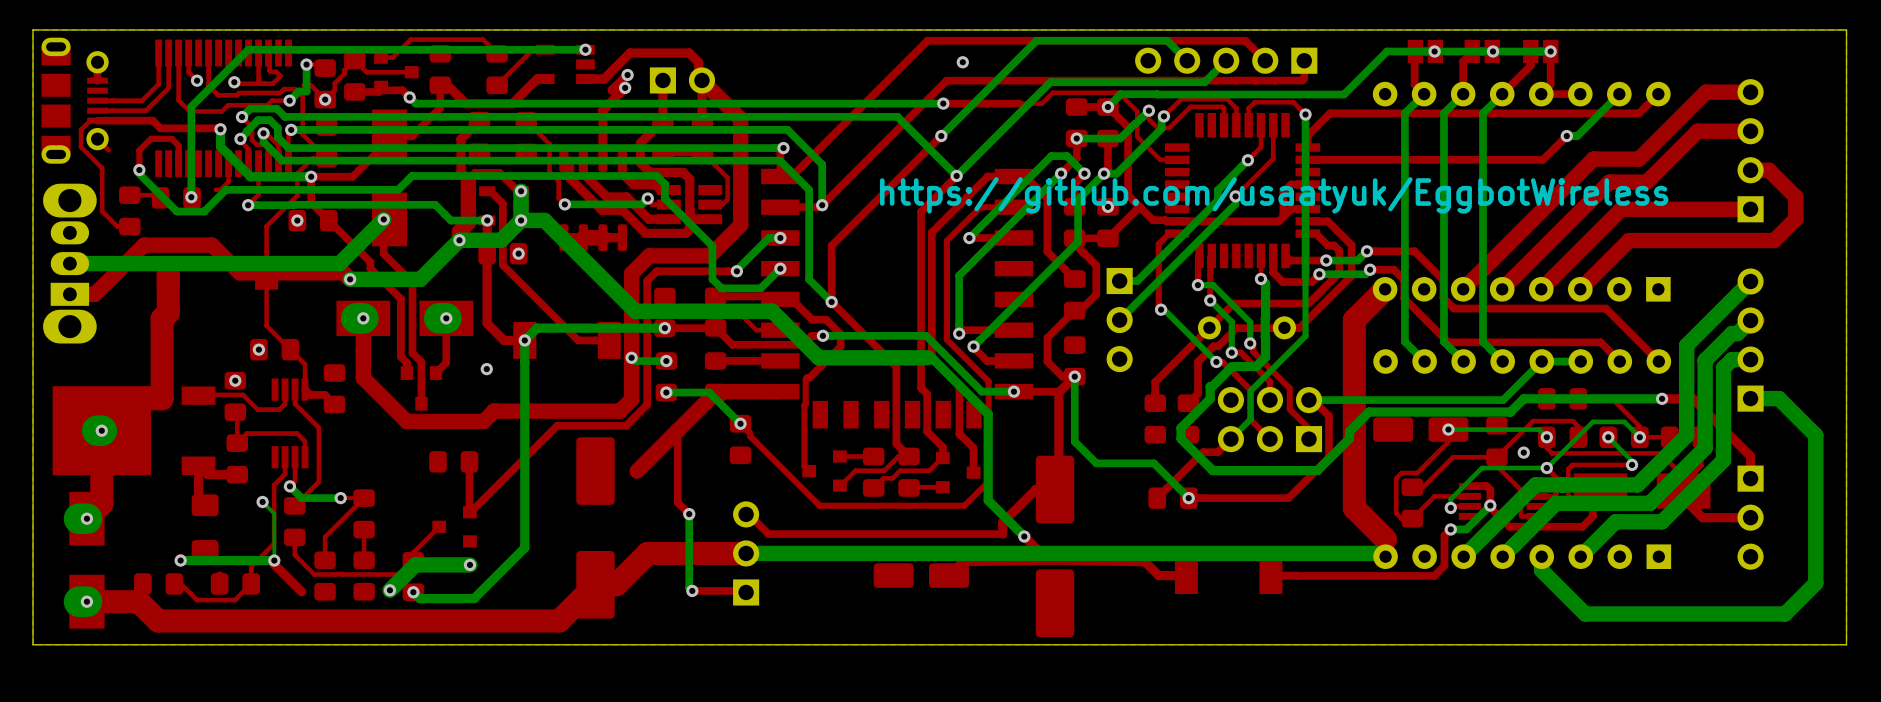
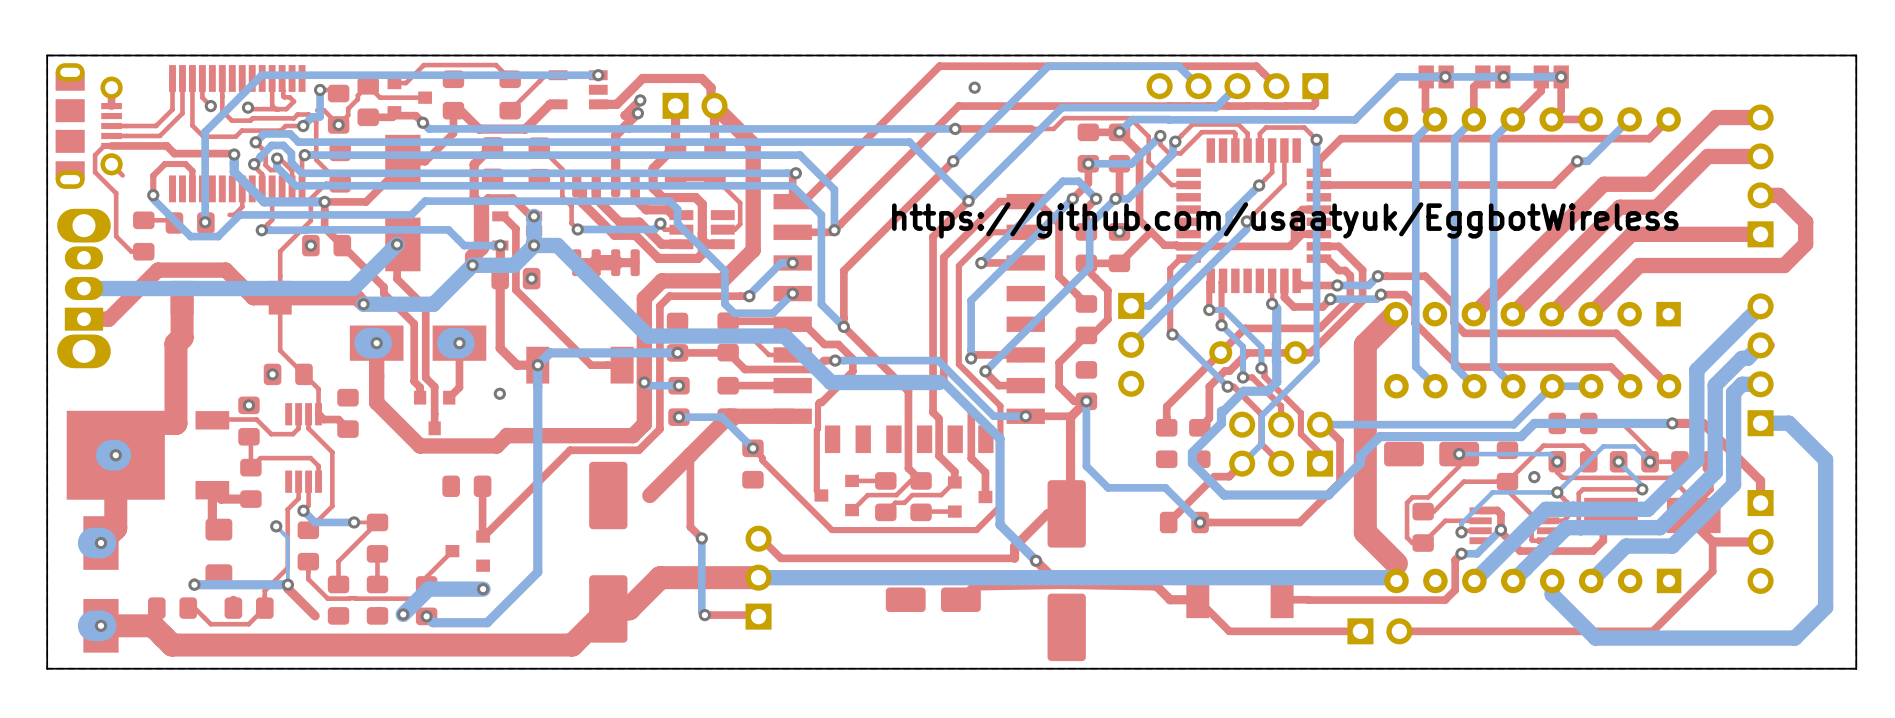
top track: none -> (1712, 541) (1712, 571) (1652, 631) (1399, 631)
top track: none -> (1197, 599) (1229, 631) (1360, 631)
part: none -> (1379, 631)

